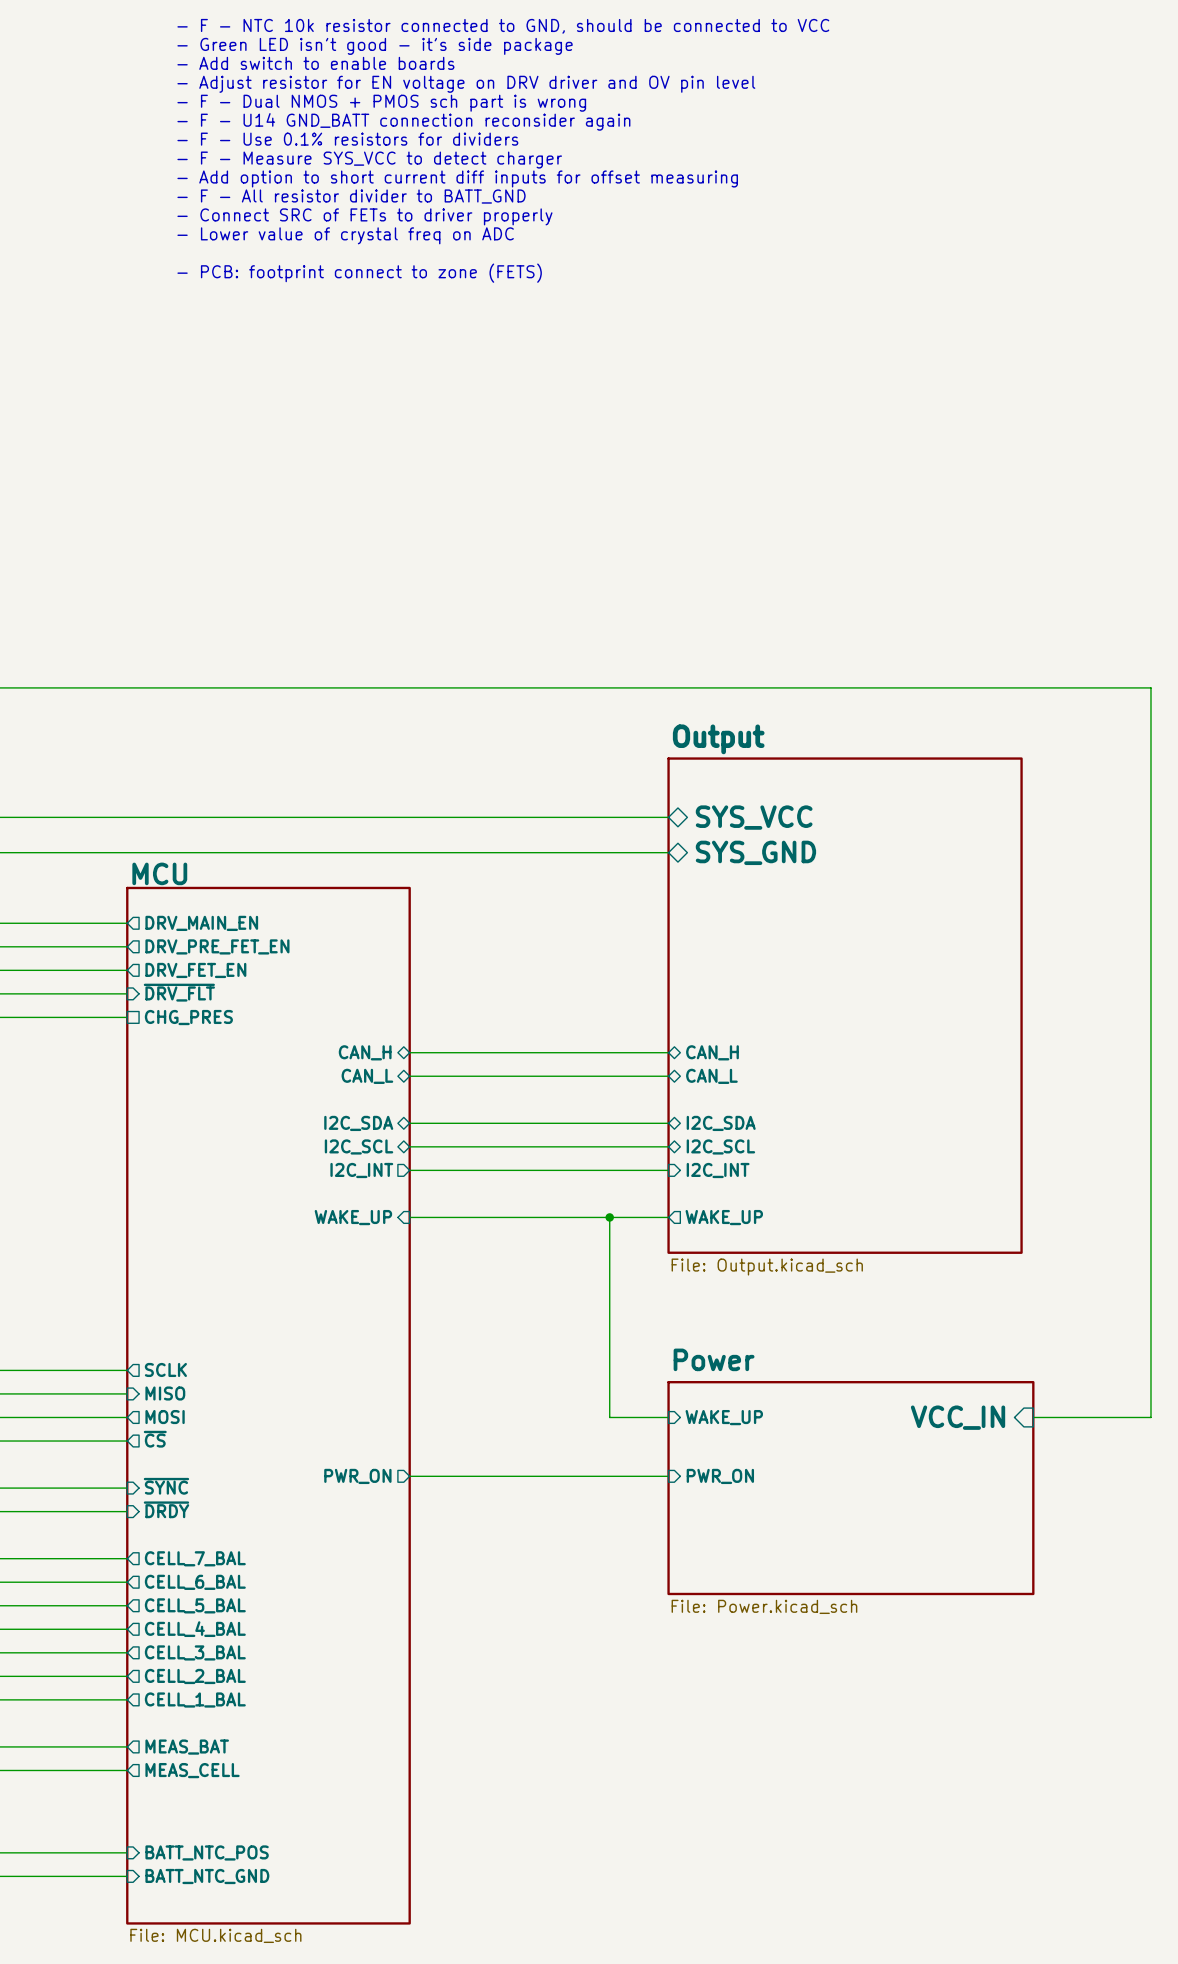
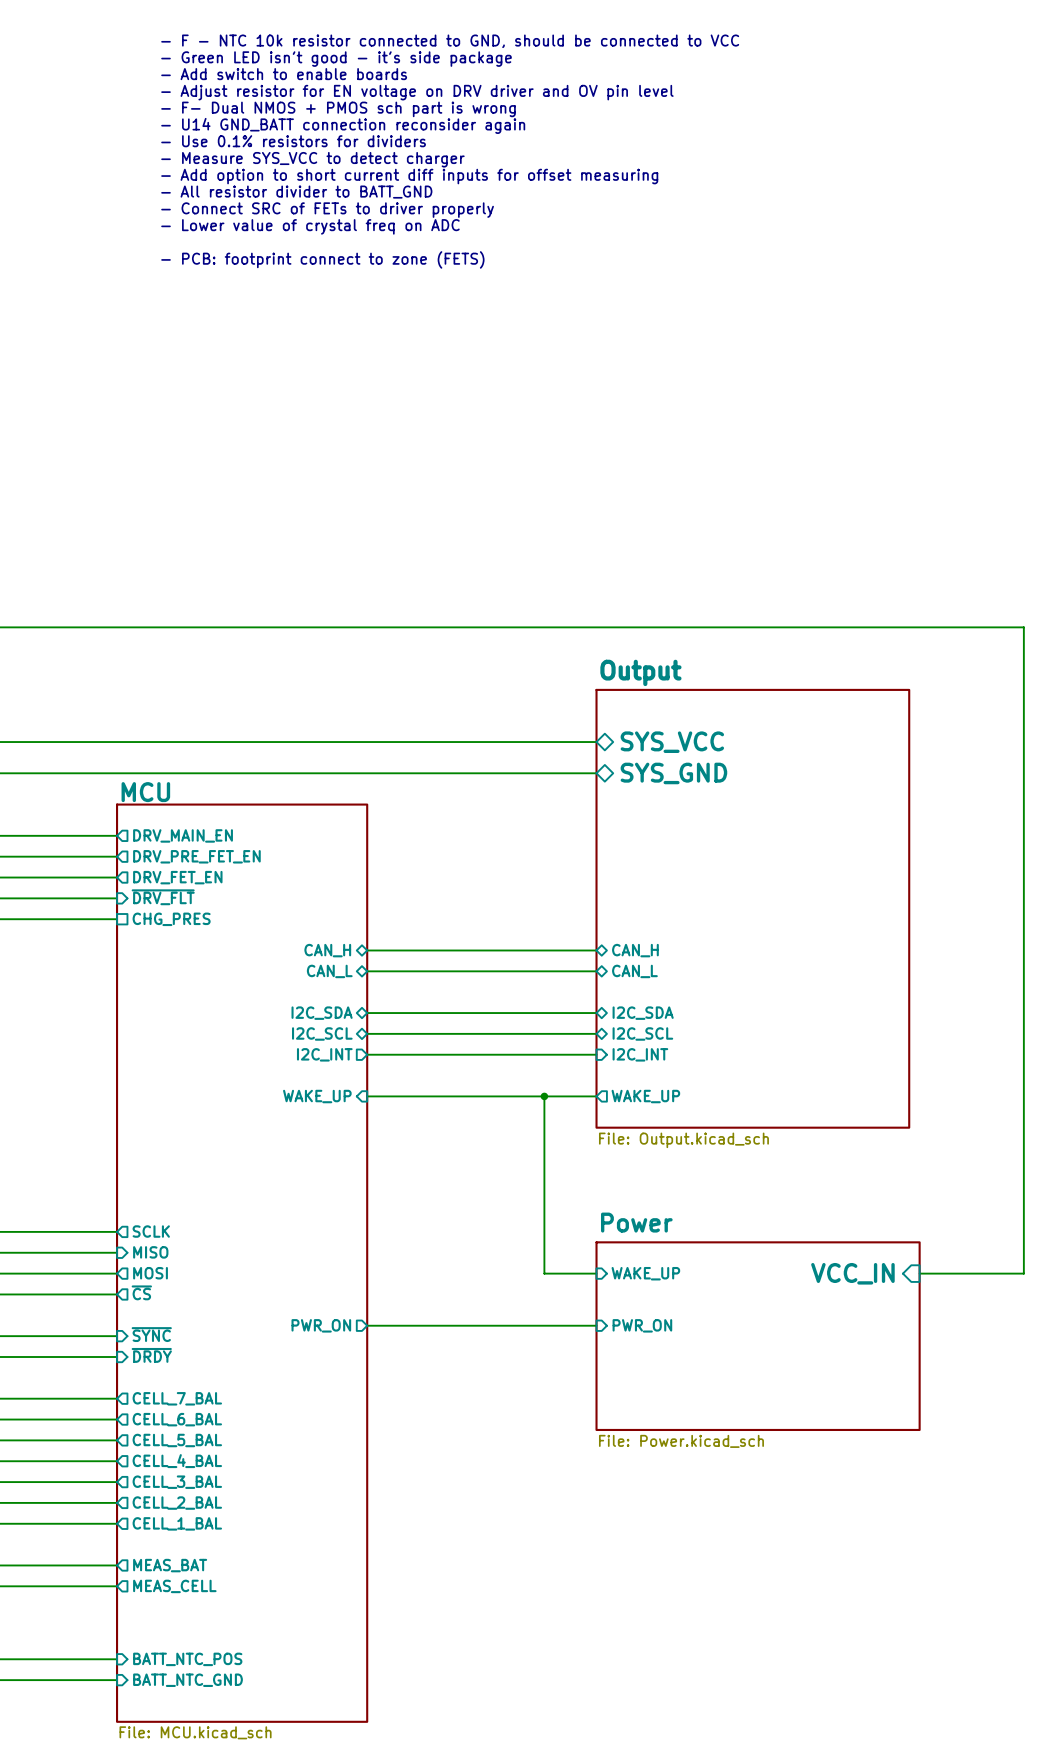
text: - F - Dual NMOS + PMOS sch part is wrong (381, 103) -> - F- Dual NMOS + PMOS sch part is wrong (338, 109)
text: - F - U14 GND_BATT connection reconsider again (403, 121) -> - U14 GND_BATT connection reconsider again (343, 125)
text: - F - Use 0.1% resistors for dividers (347, 139) -> - Use 0.1% resistors for dividers (293, 141)
text: - F - Measure SYS_VCC to detect charger (369, 160) -> - Measure SYS_VCC to detect charger (312, 159)
text: - F - All resistor divider to BATT_GND (351, 196) -> - All resistor divider to BATT_GND (296, 192)

